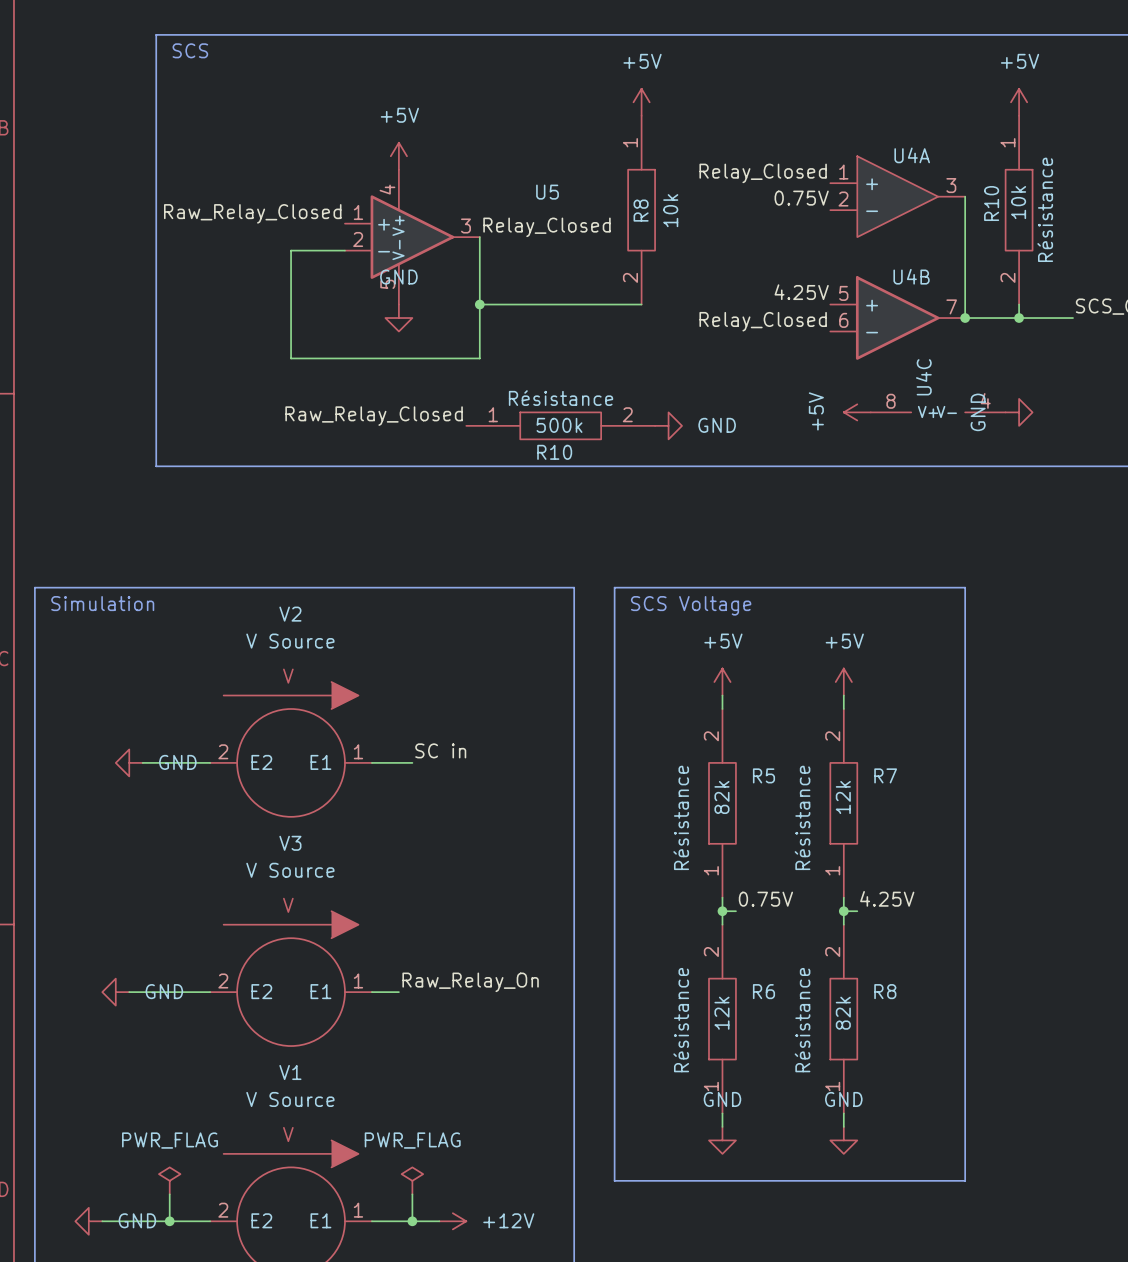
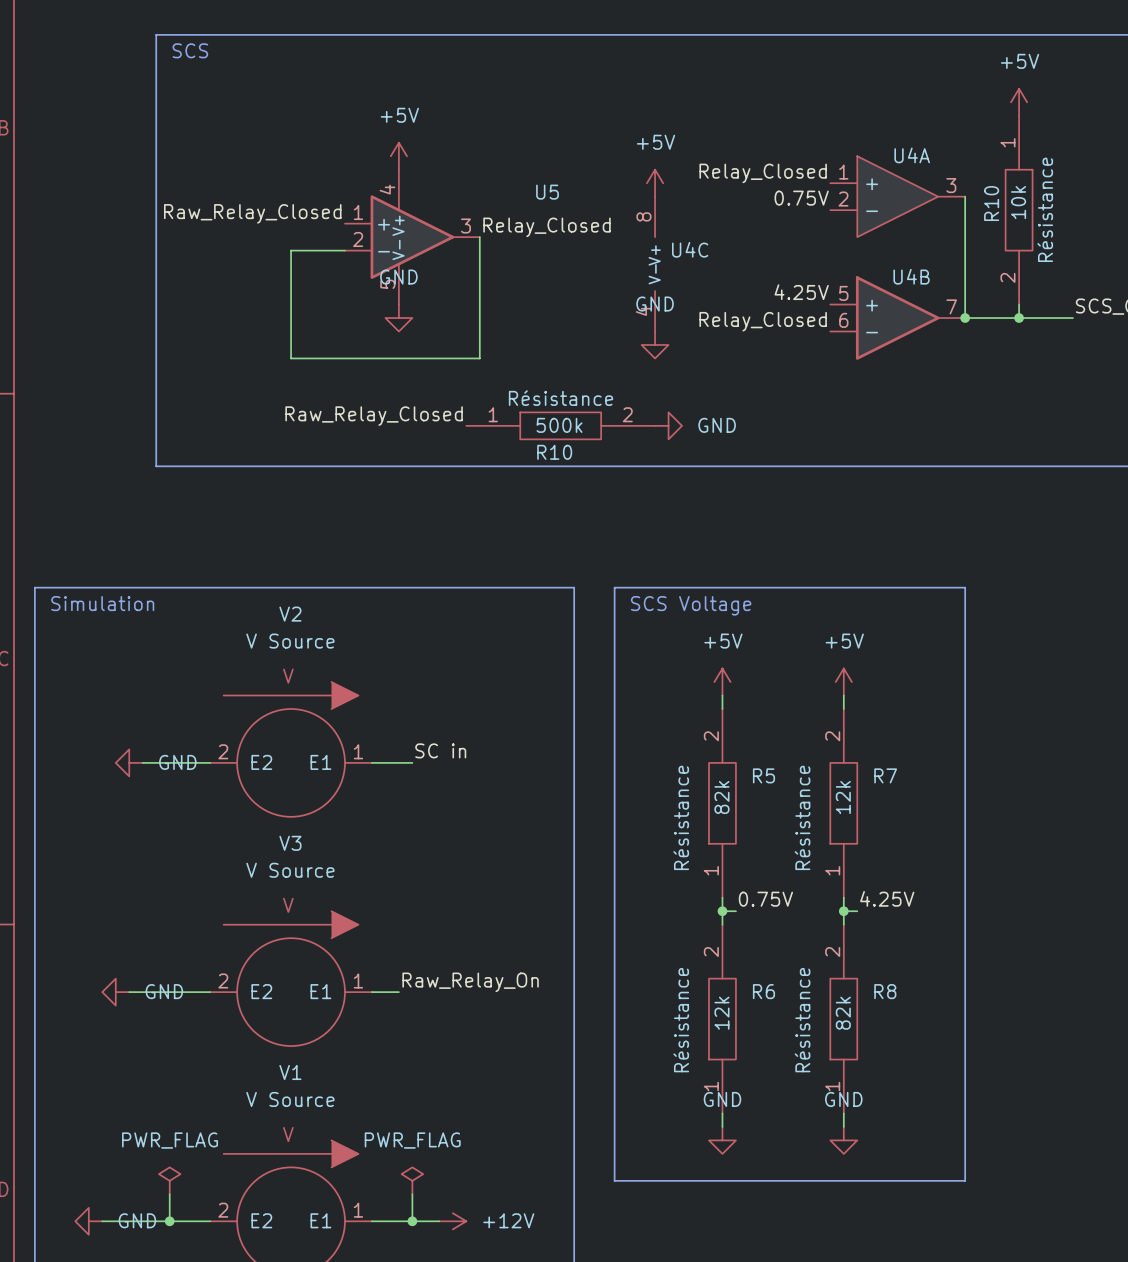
power symbol position: +5V (641, 102) -> +5V (655, 183)
R8: 10k (641, 210) -> none
wire: (479, 304) (641, 304) -> none
junction: (479, 304) -> none
power symbol: none -> GND (655, 344)
power symbol: +5V (857, 412) -> none
U4C rotation: 0° (938, 412) -> 90° clockwise (655, 264)
U4C position: (938, 412) -> (655, 264)
power symbol: GND (1019, 412) -> none

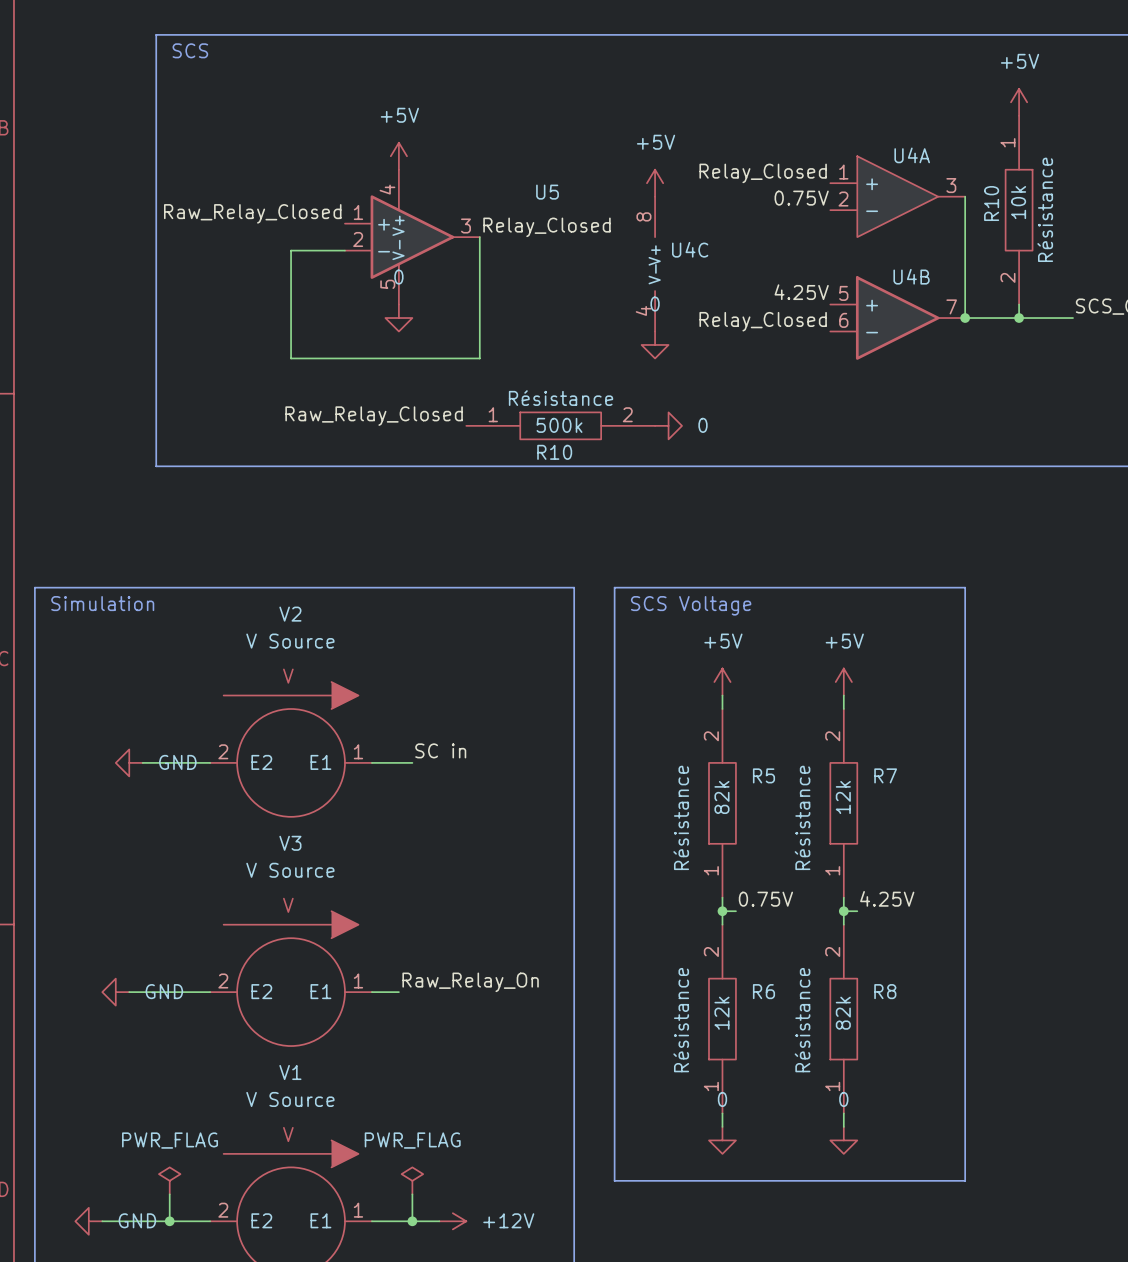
power symbol: GND (398, 318) -> 0 (398, 318)
power symbol: GND (655, 344) -> 0 (655, 344)
power symbol: GND (668, 425) -> 0 (668, 425)
power symbol: GND (722, 1140) -> 0 (722, 1140)
power symbol: GND (843, 1140) -> 0 (843, 1140)

